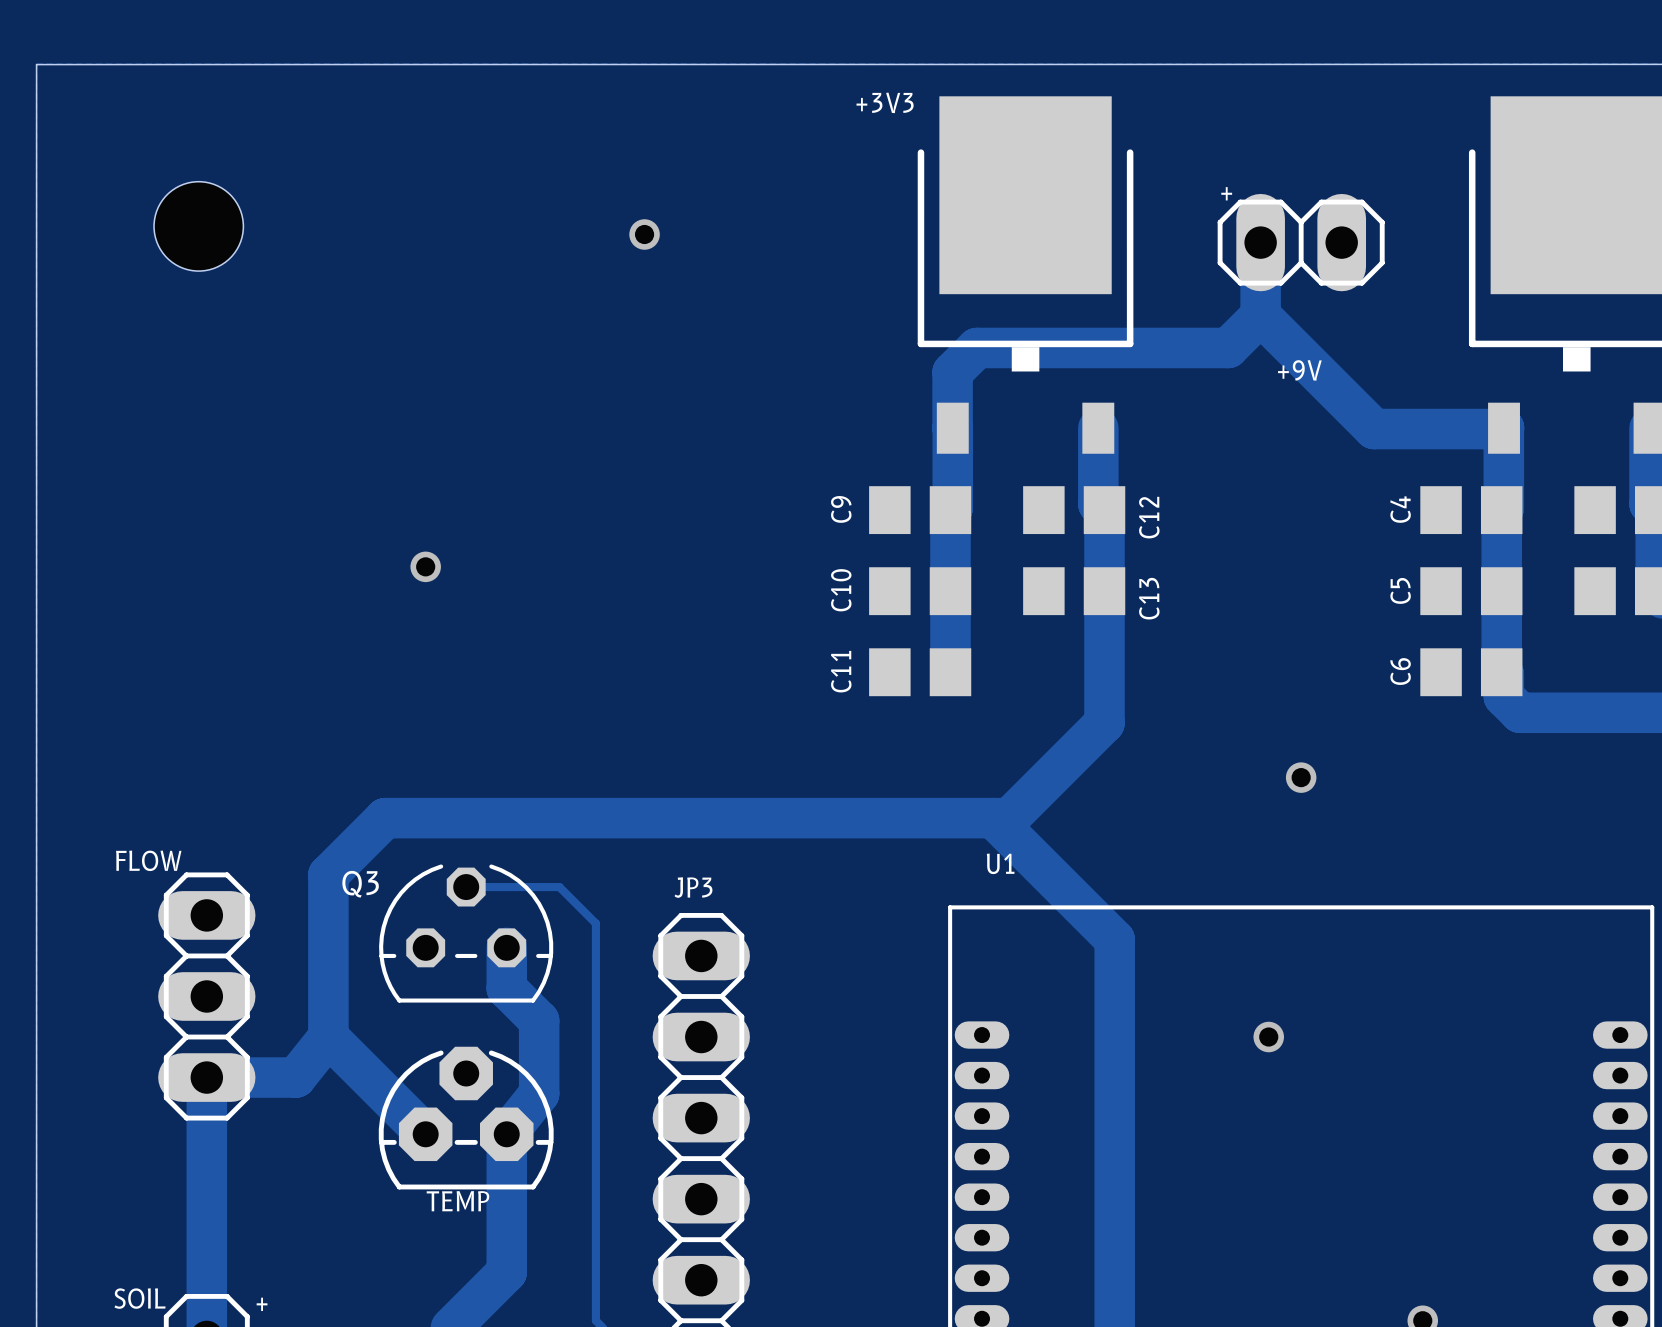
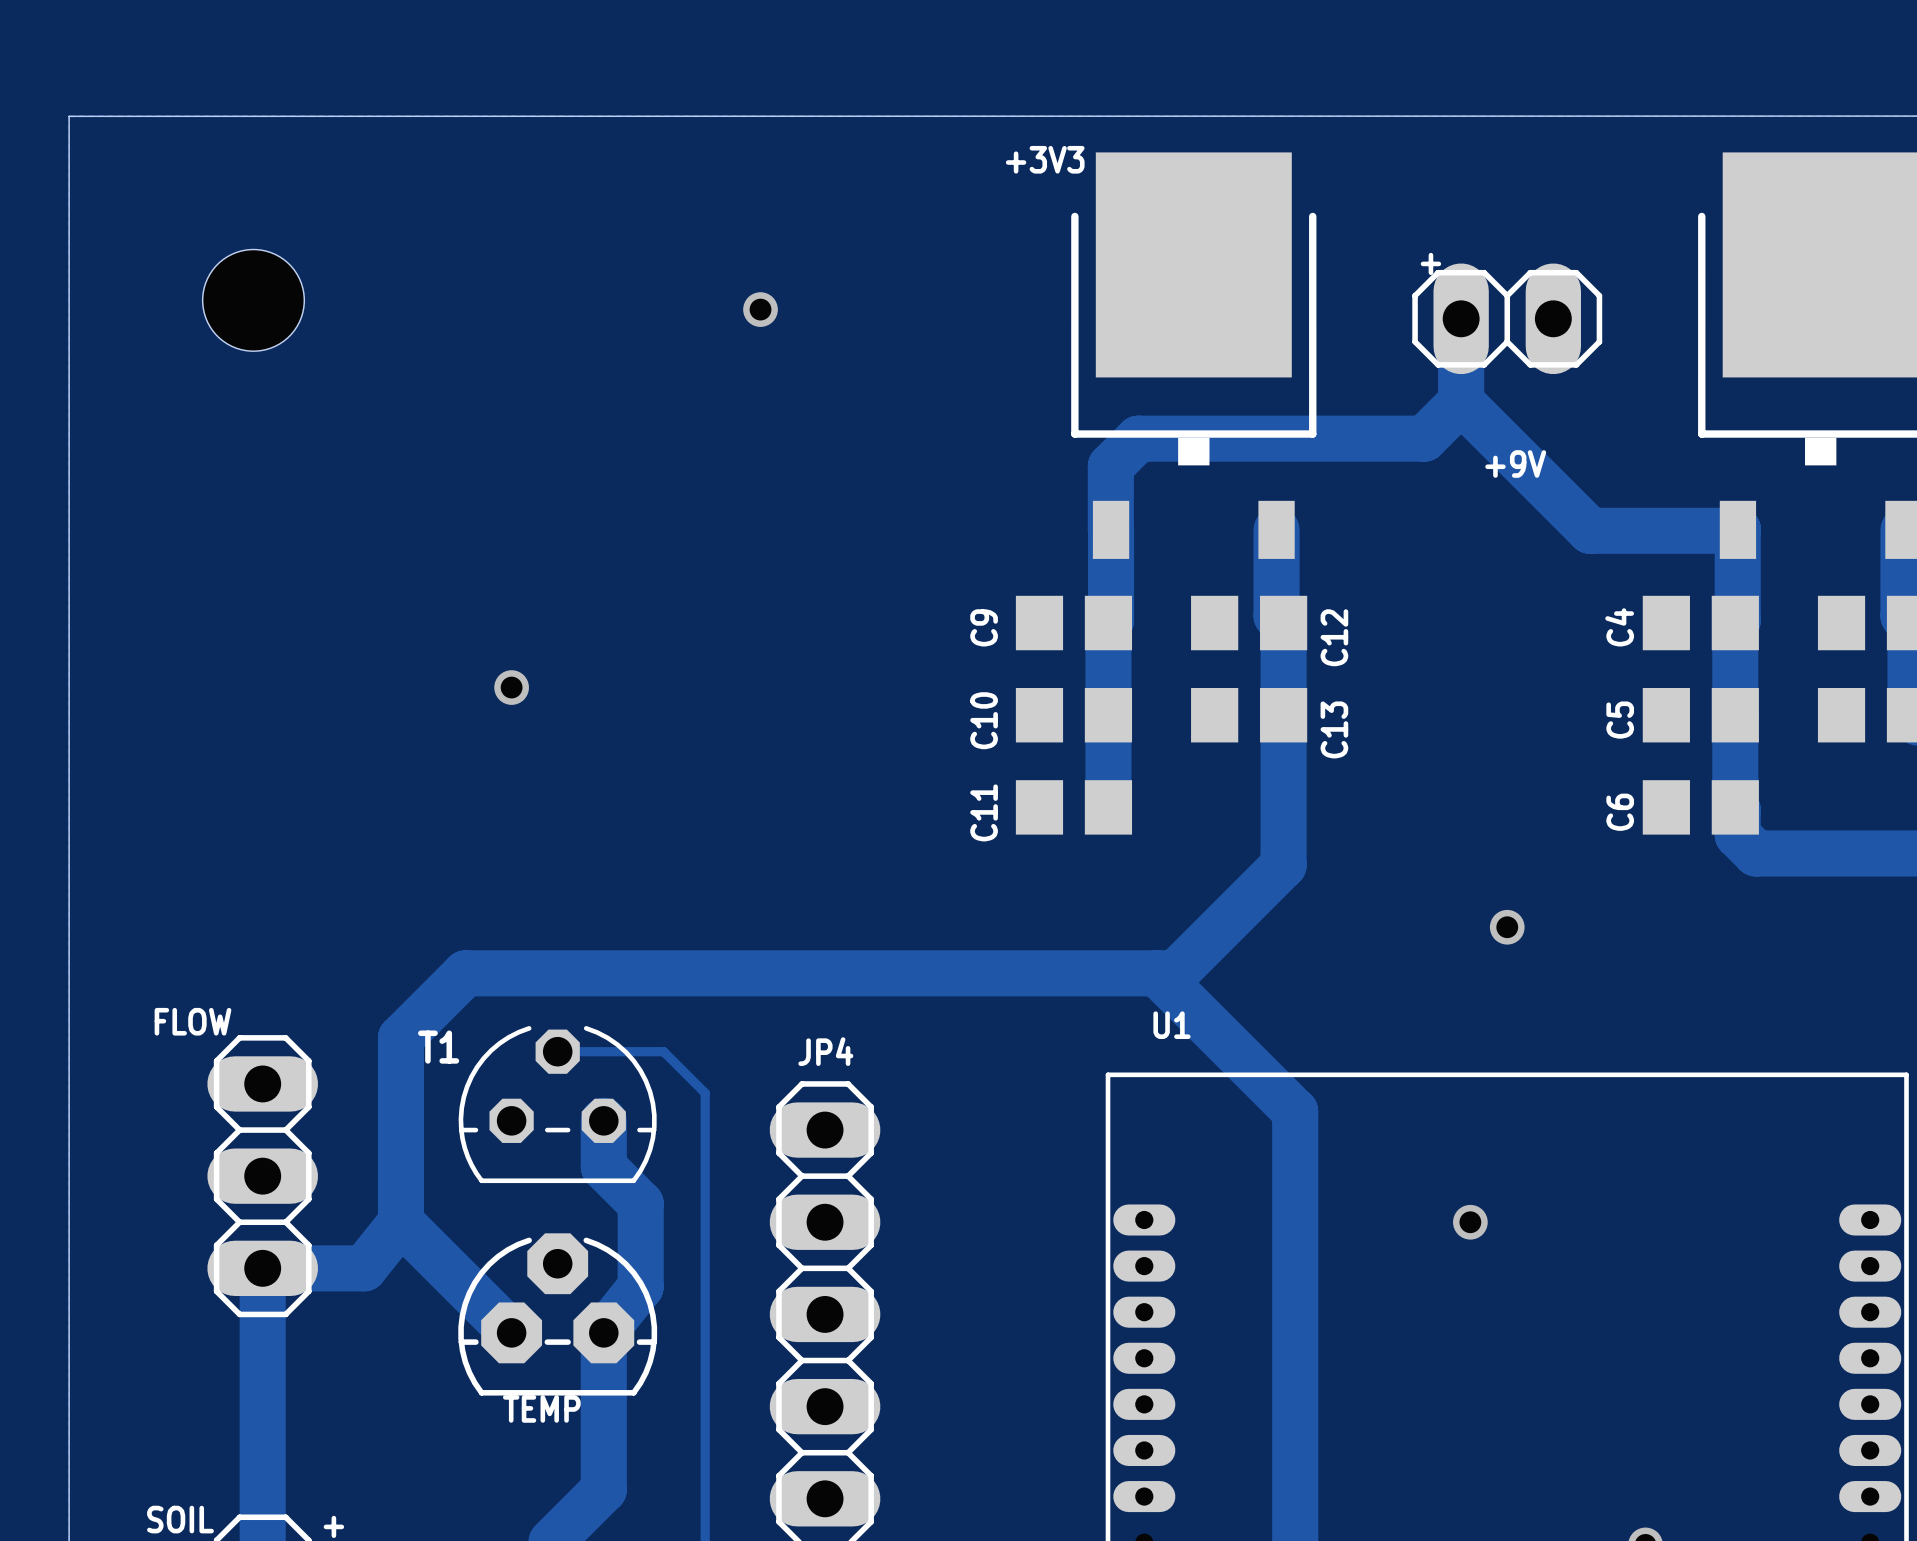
Q3 name: Q3 (360, 884) -> T1 (438, 1047)
JP3 name: JP3 (693, 887) -> JP4 (825, 1051)

